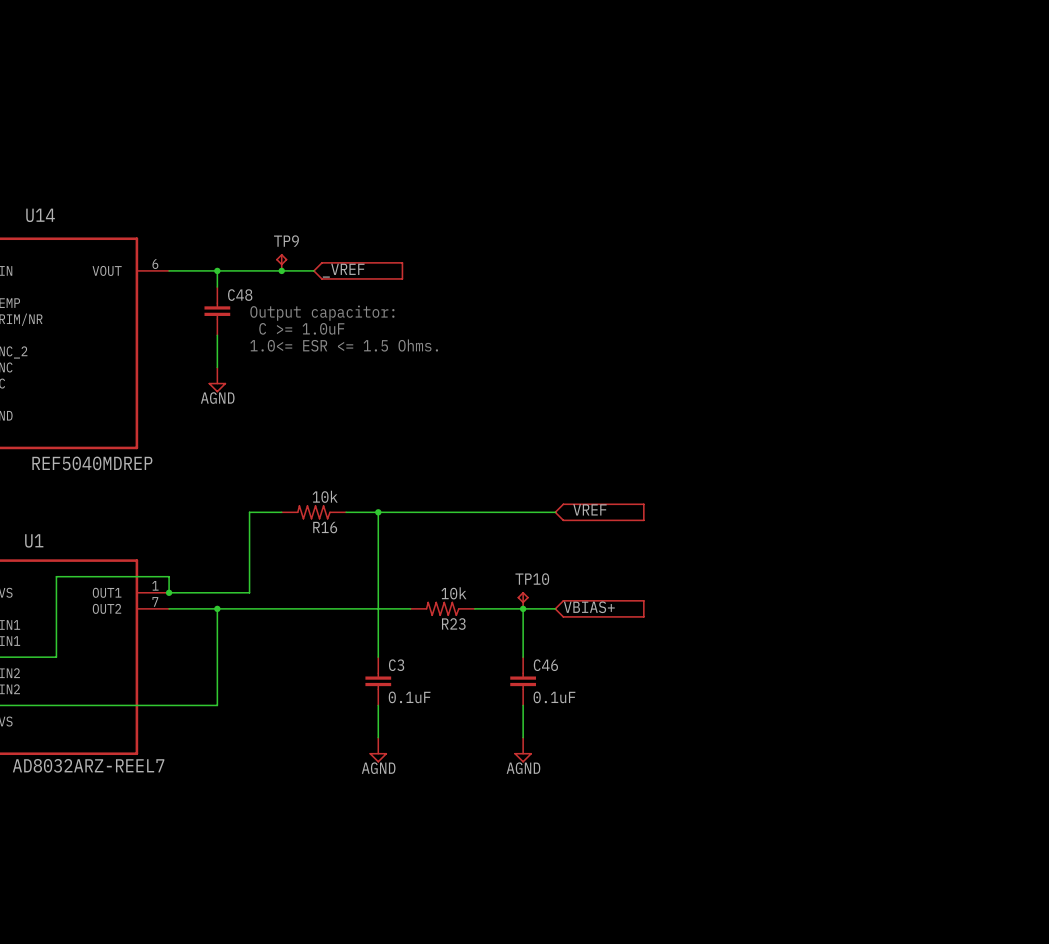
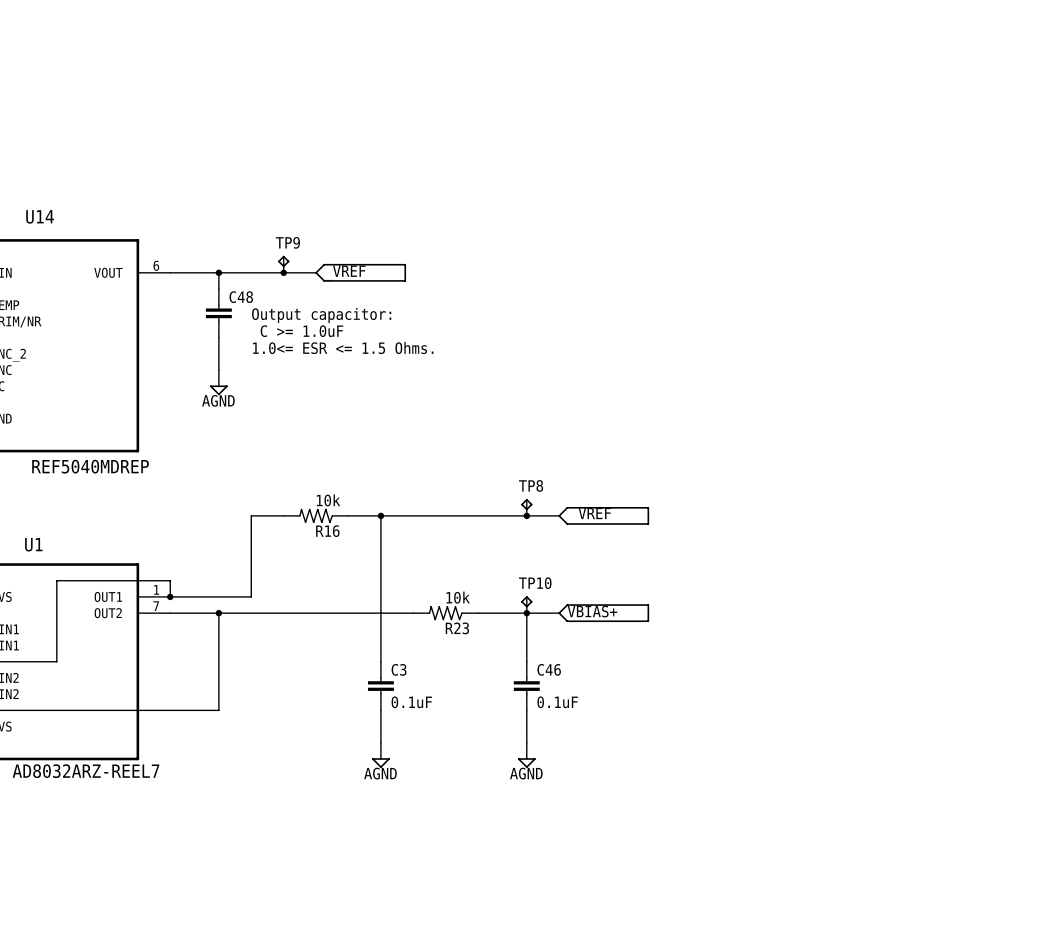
TP8: none -> (526, 507)
junction: none -> (526, 515)

